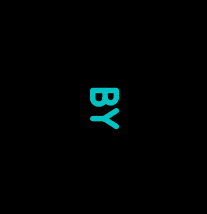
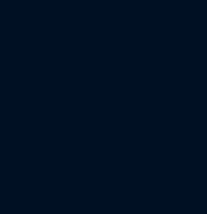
text: BY (104, 108) -> none

